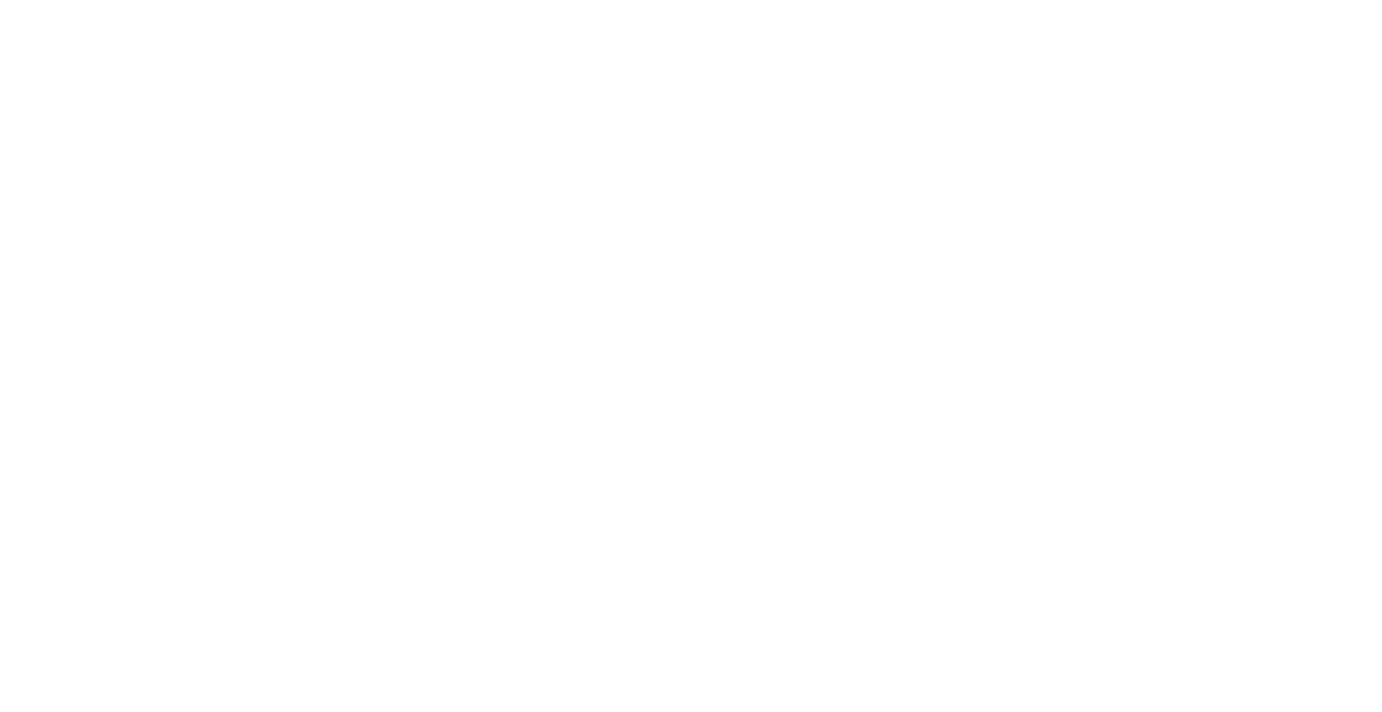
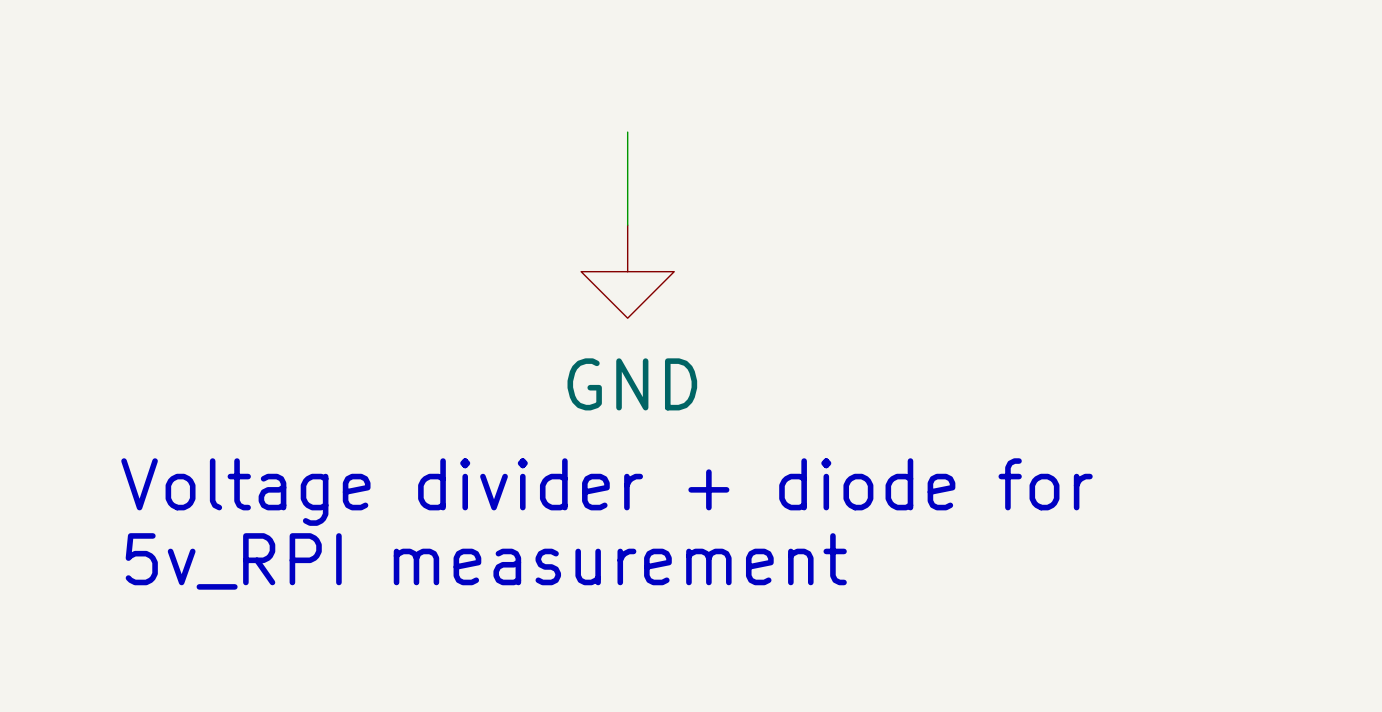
wire: none -> (627, 132) (627, 225)
power symbol: none -> GND (627, 271)
text: none -> Voltage divider + diode for (606, 492)
text: none -> 5v_RPI measurement (486, 561)

